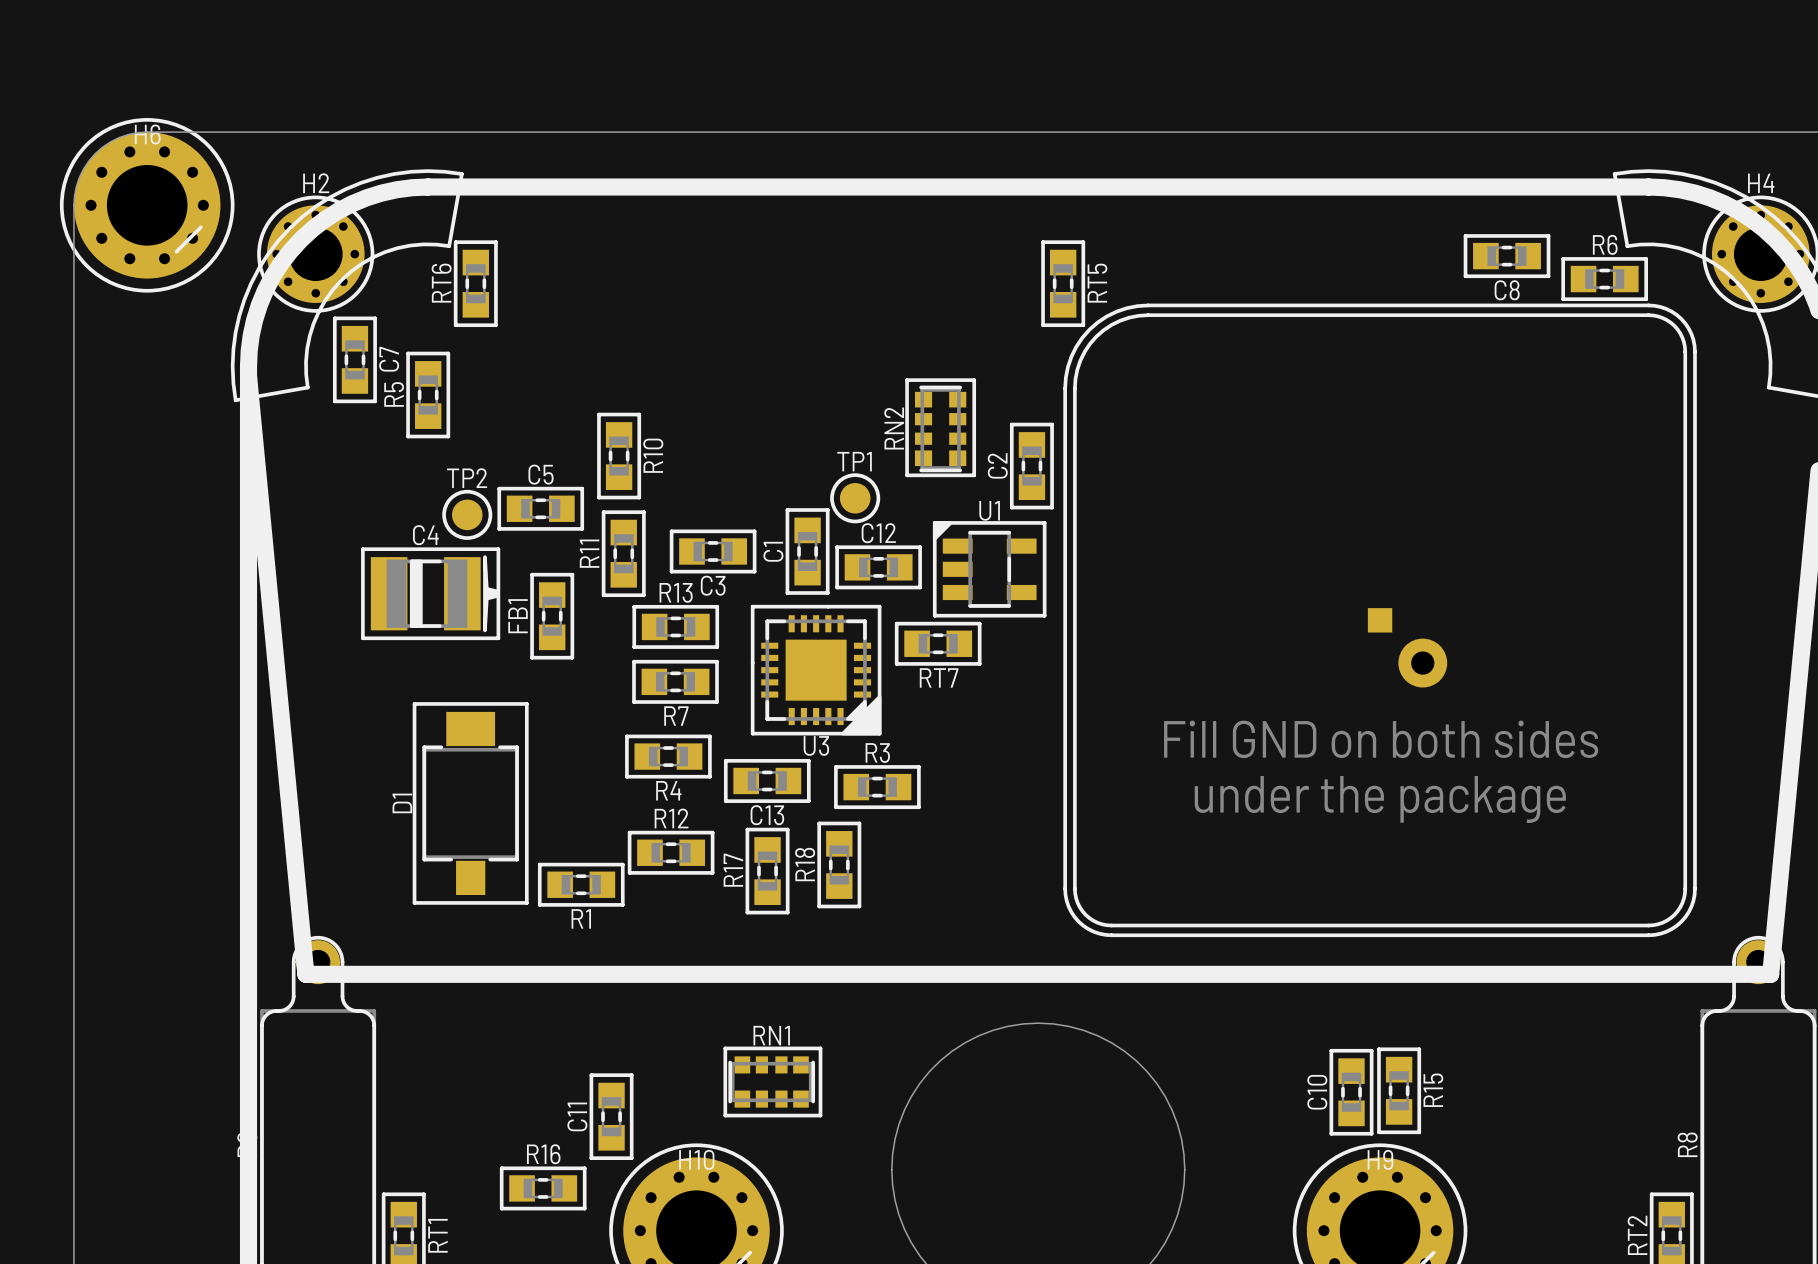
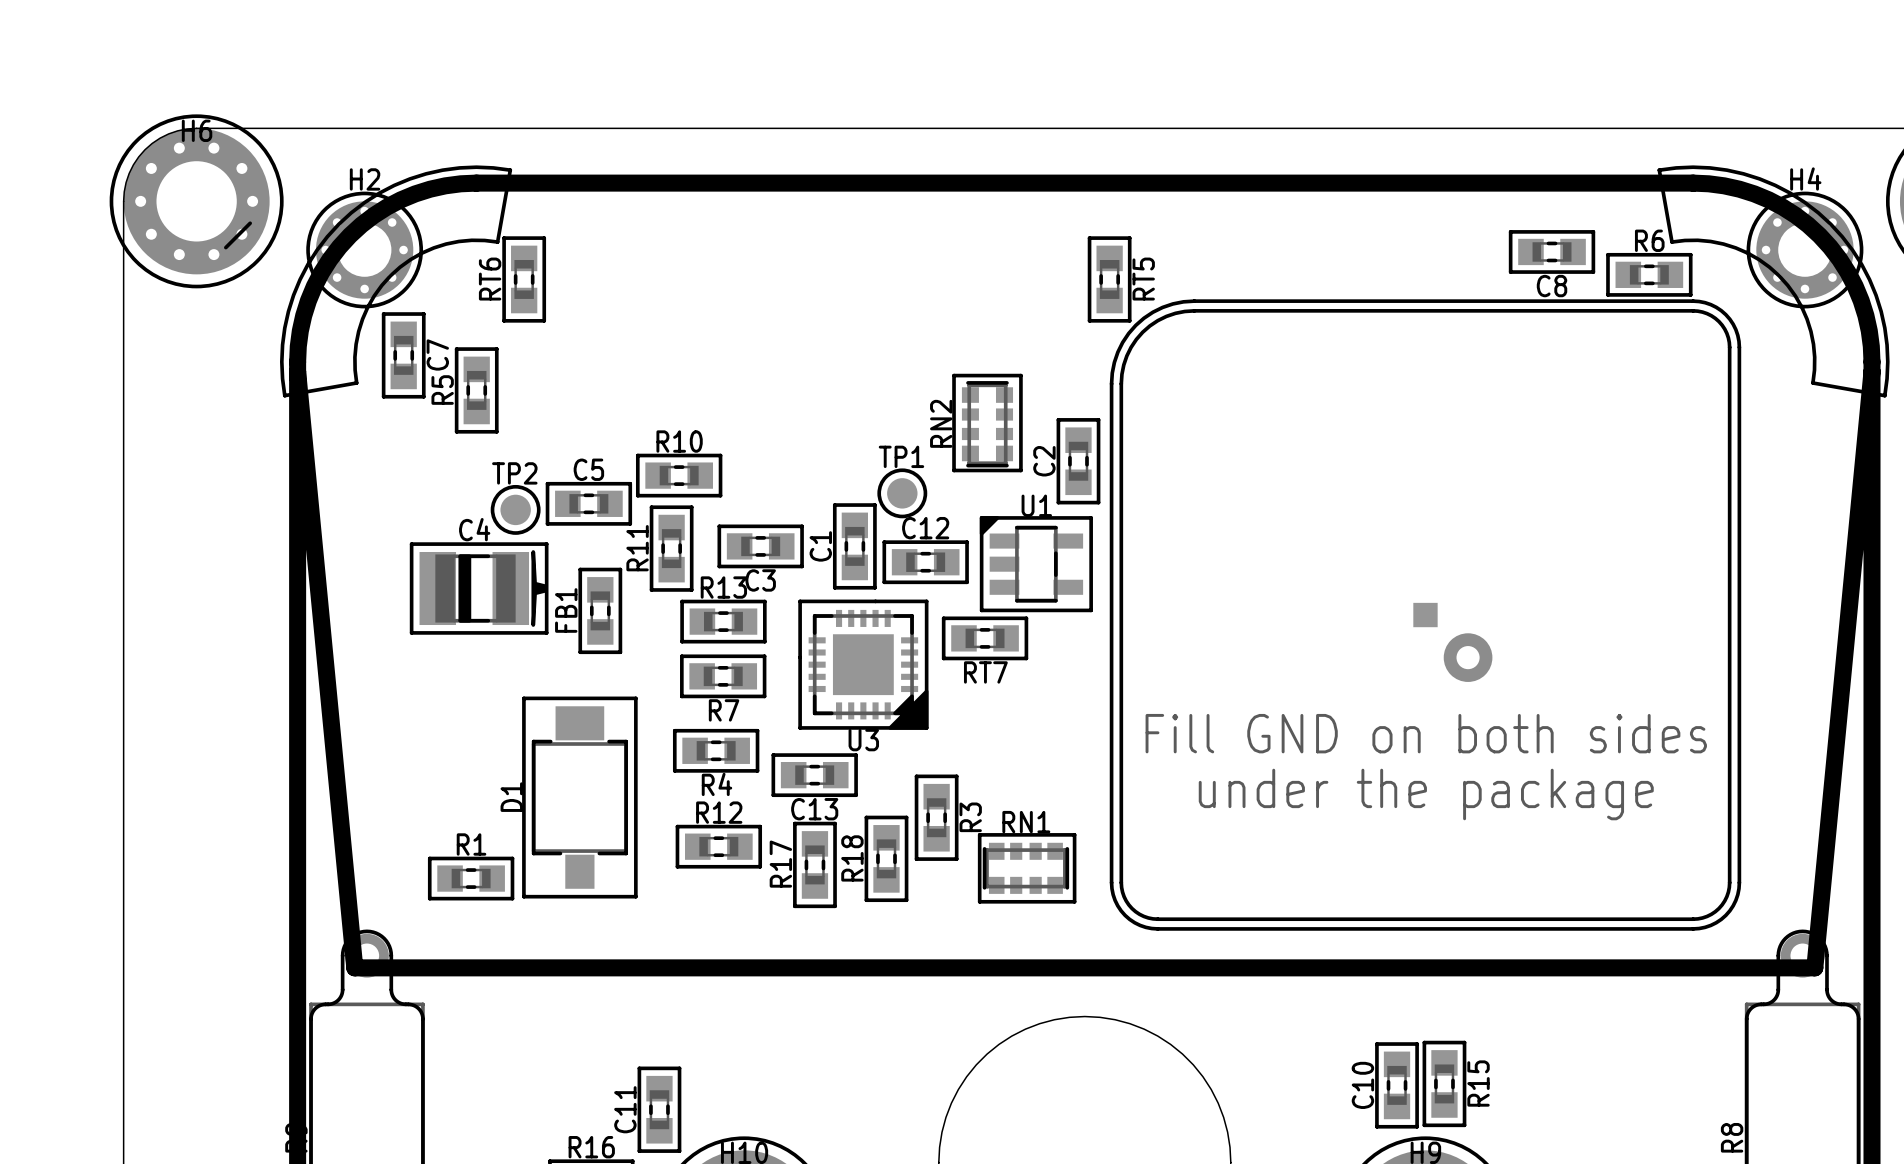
R10 rotation: 0° (619, 456) -> 90° clockwise (679, 475)
R3 rotation: 0° (877, 787) -> 90° clockwise (936, 817)
D1 position: (470, 803) -> (579, 797)
R1 position: (581, 884) -> (471, 878)
R1 name position: R1 (581, 918) -> R1 (471, 844)
RN1 position: (772, 1082) -> (1027, 868)

